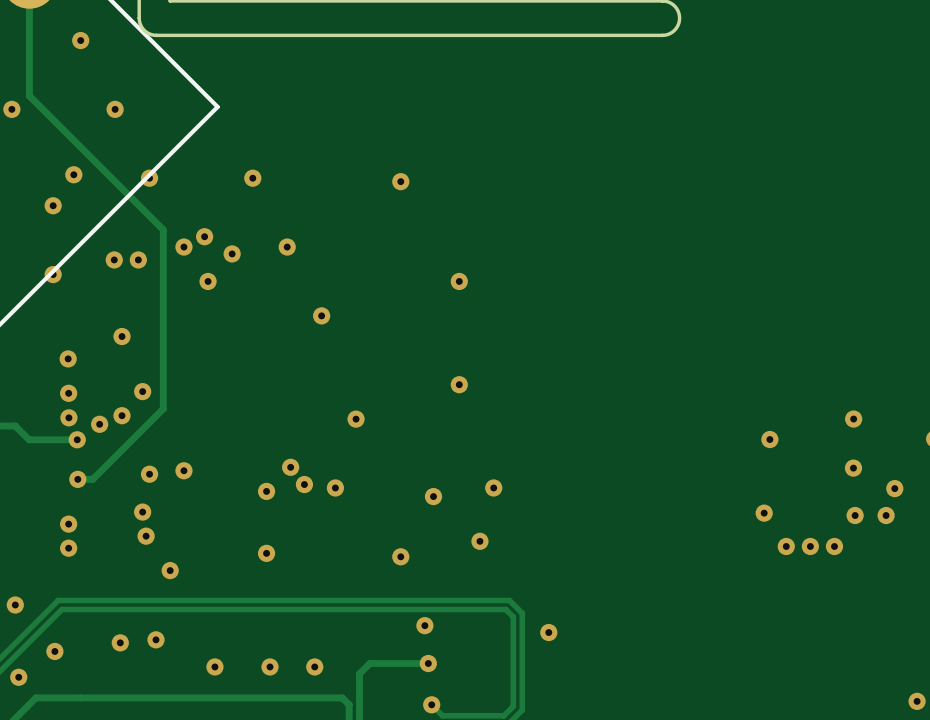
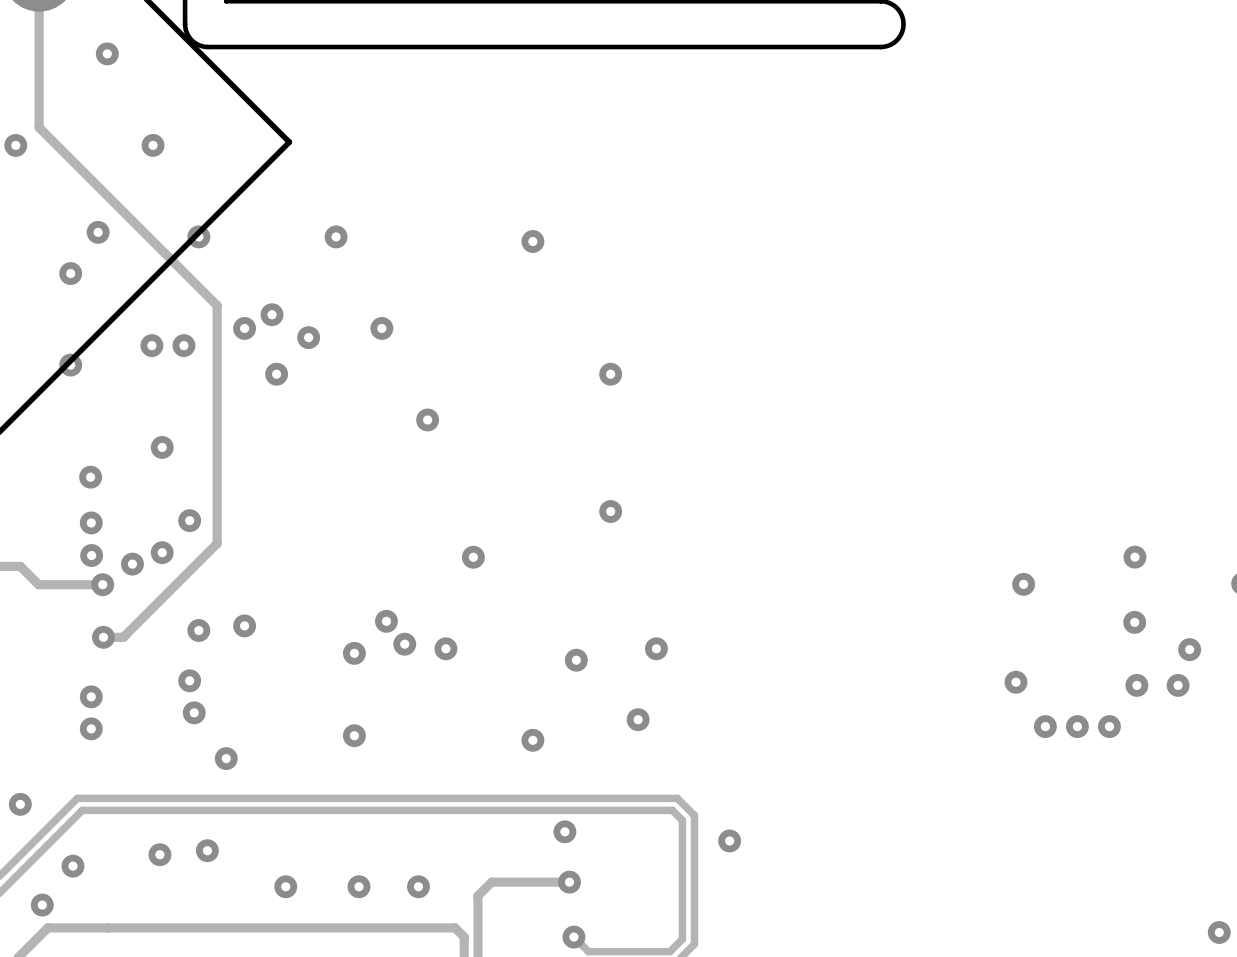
via position: (18, 677) -> (42, 905)

